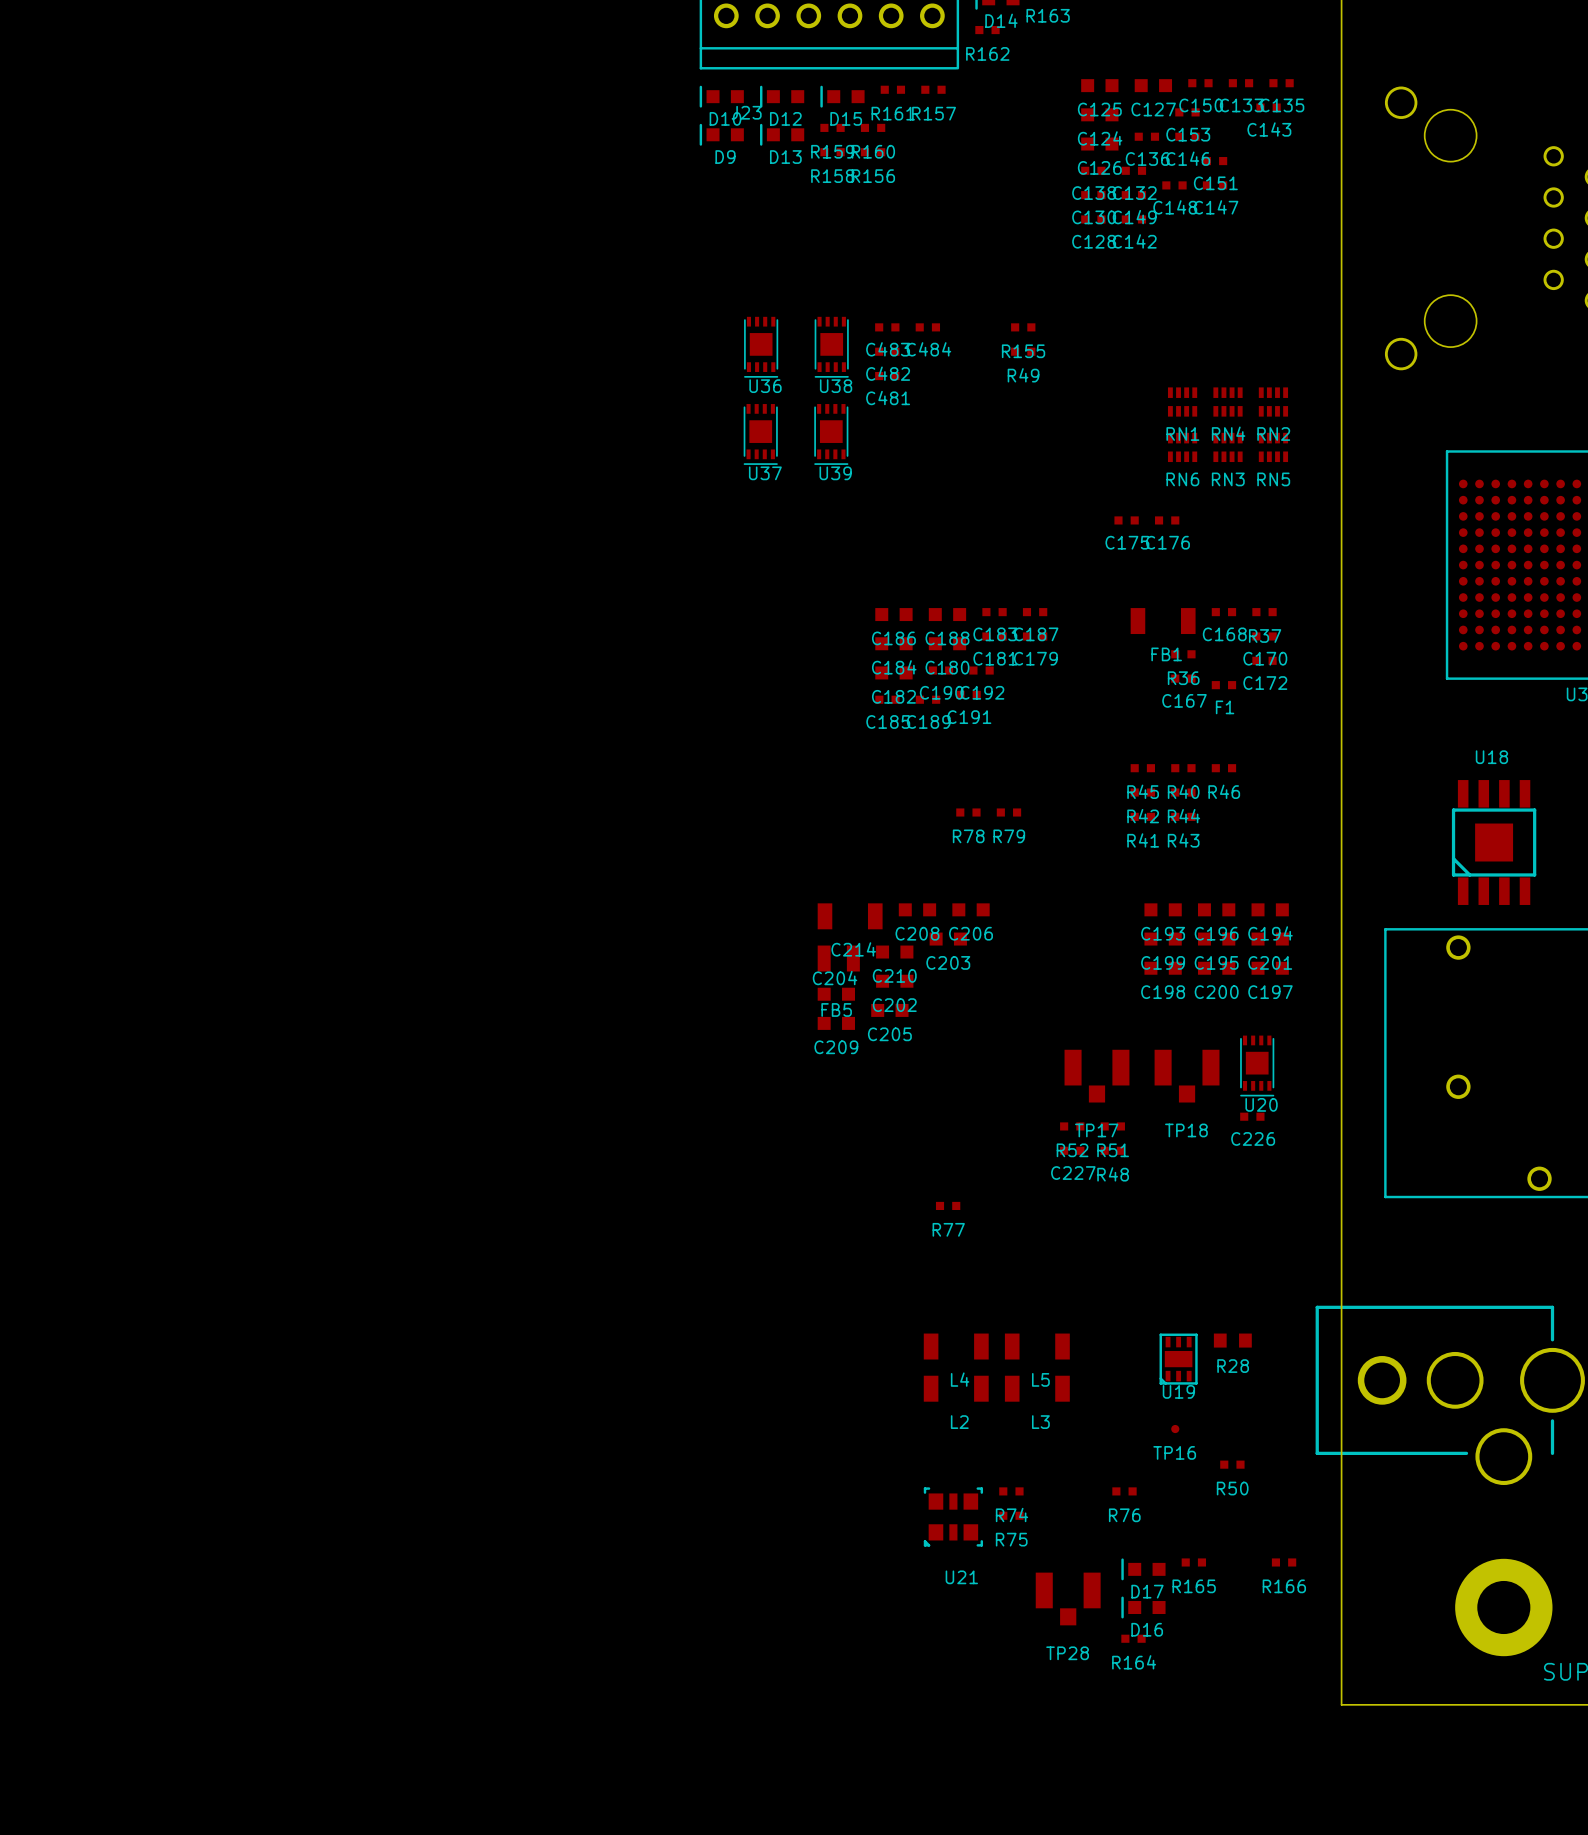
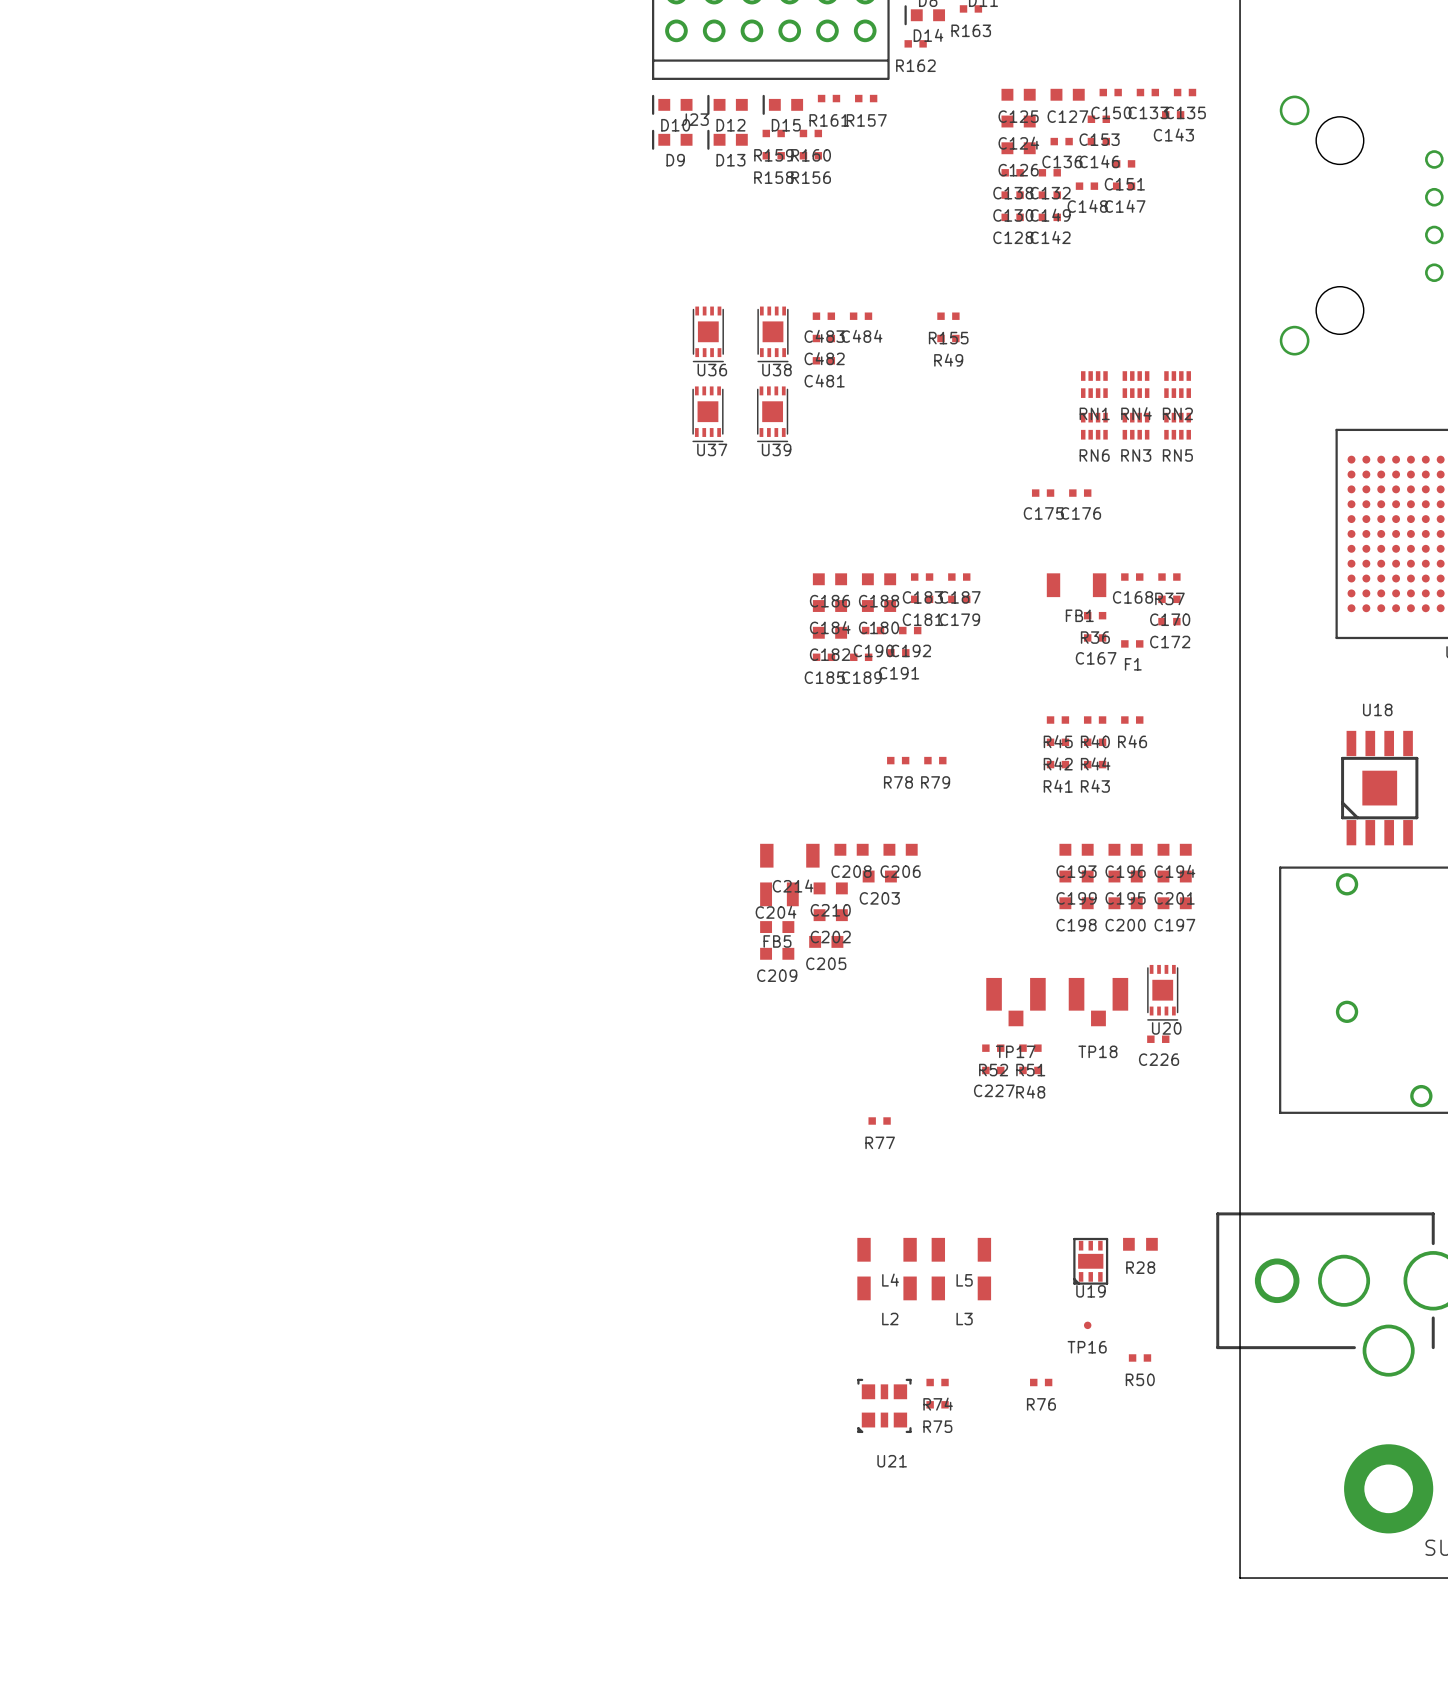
R165: (1193, 1562) -> none
R166: (1284, 1562) -> none
D17: (1143, 1569) -> none
TP28: (1068, 1598) -> none
D16: (1143, 1607) -> none
R164: (1133, 1638) -> none

